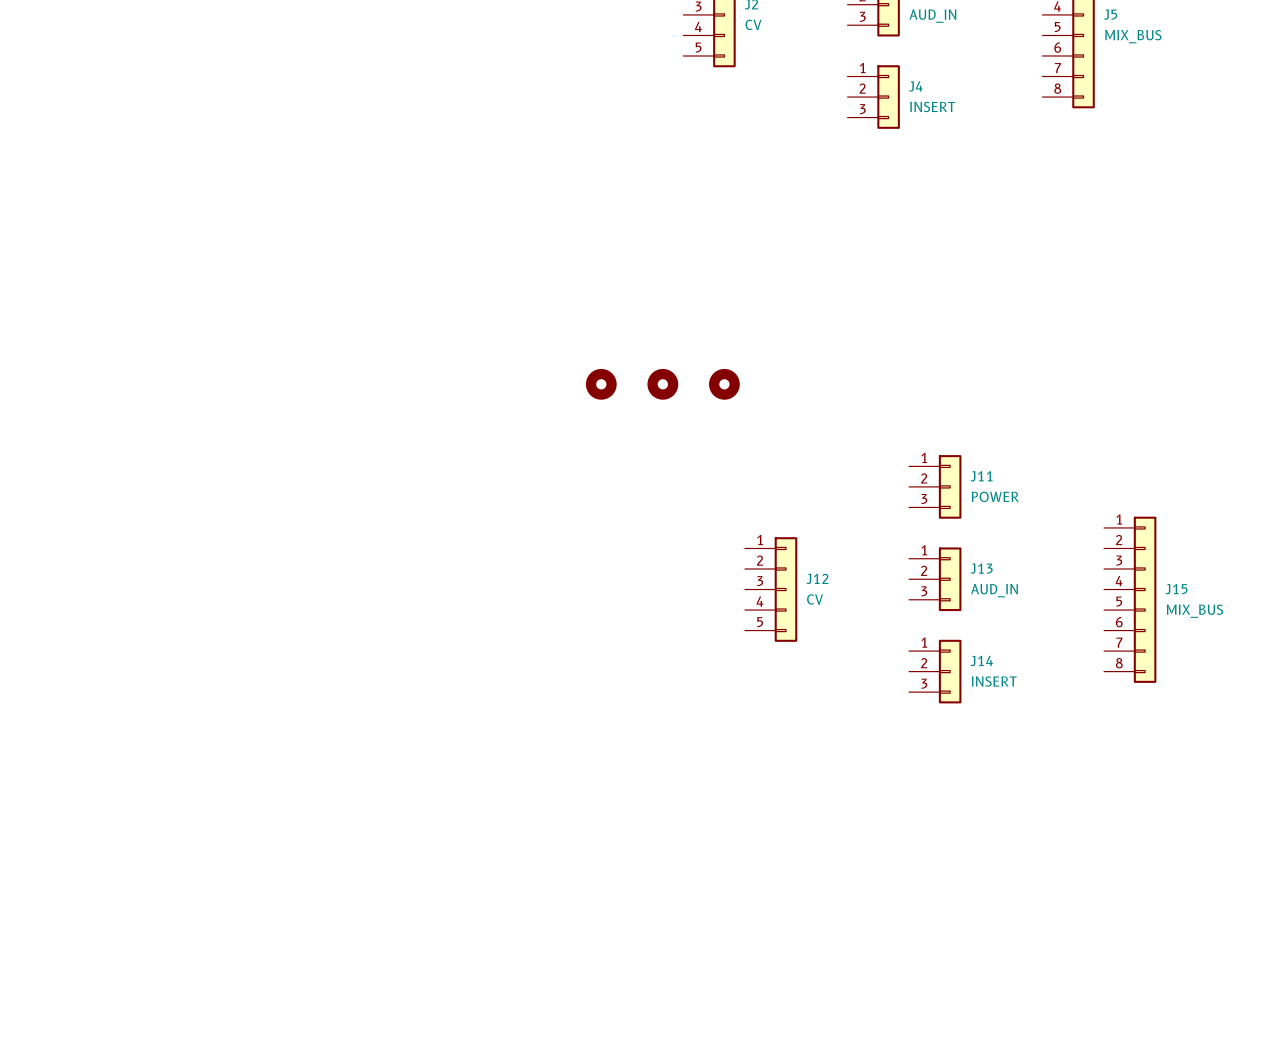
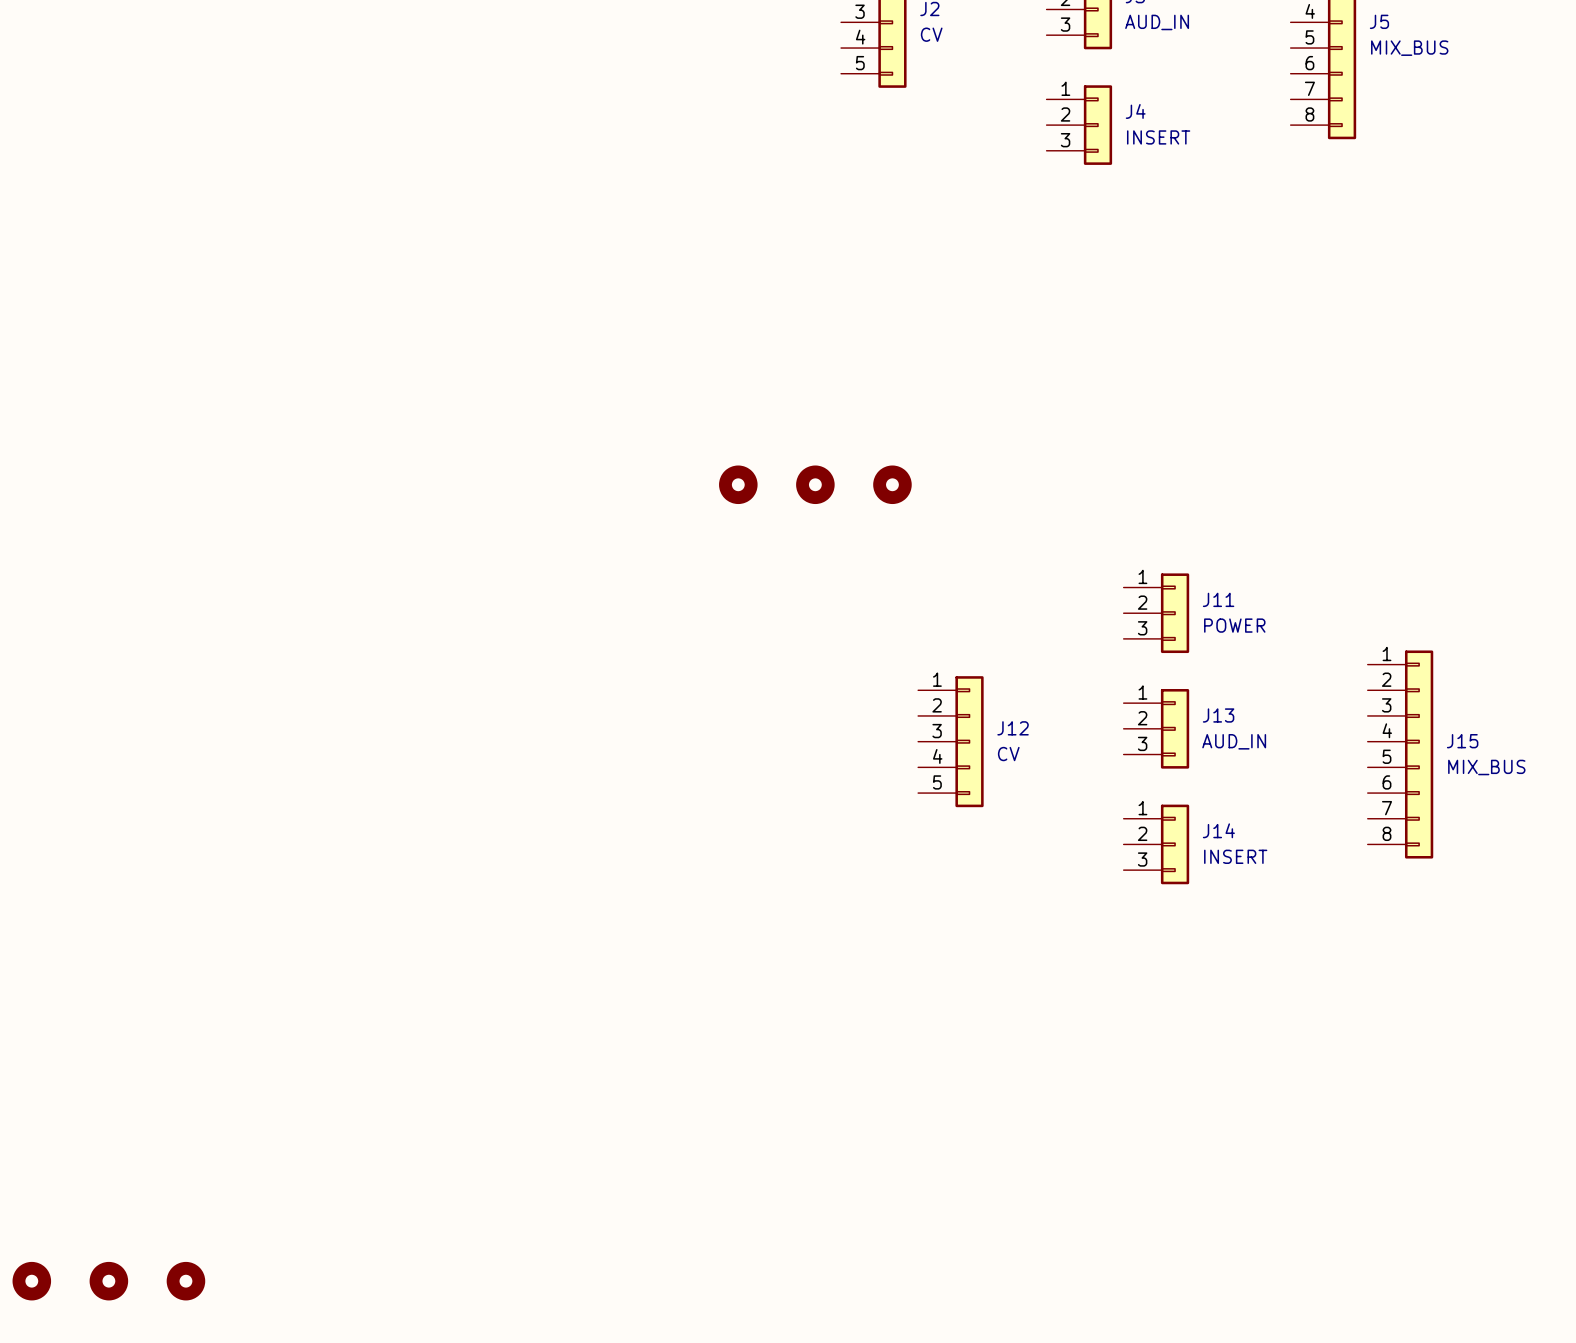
part: none -> (31, 1281)
part: none -> (108, 1281)
part: none -> (185, 1281)

